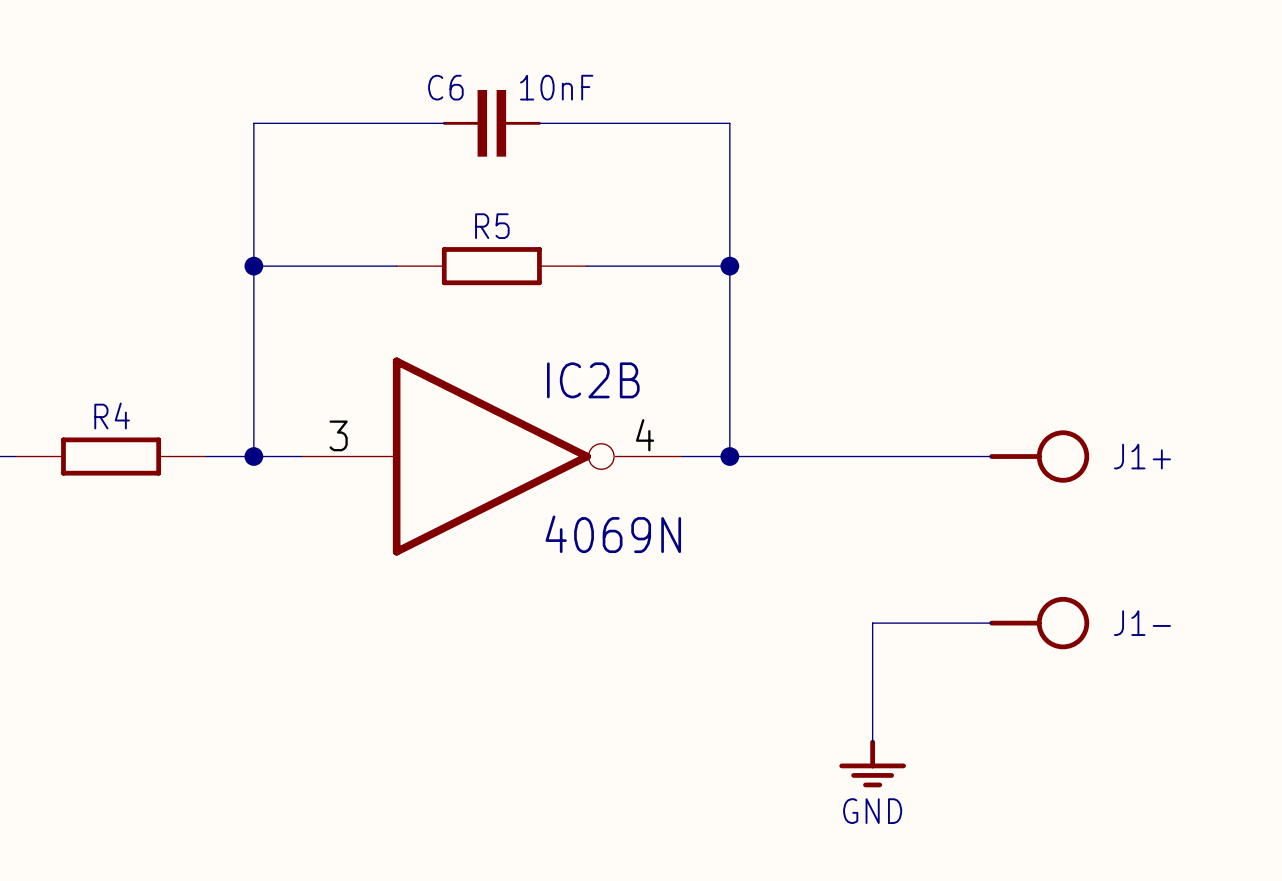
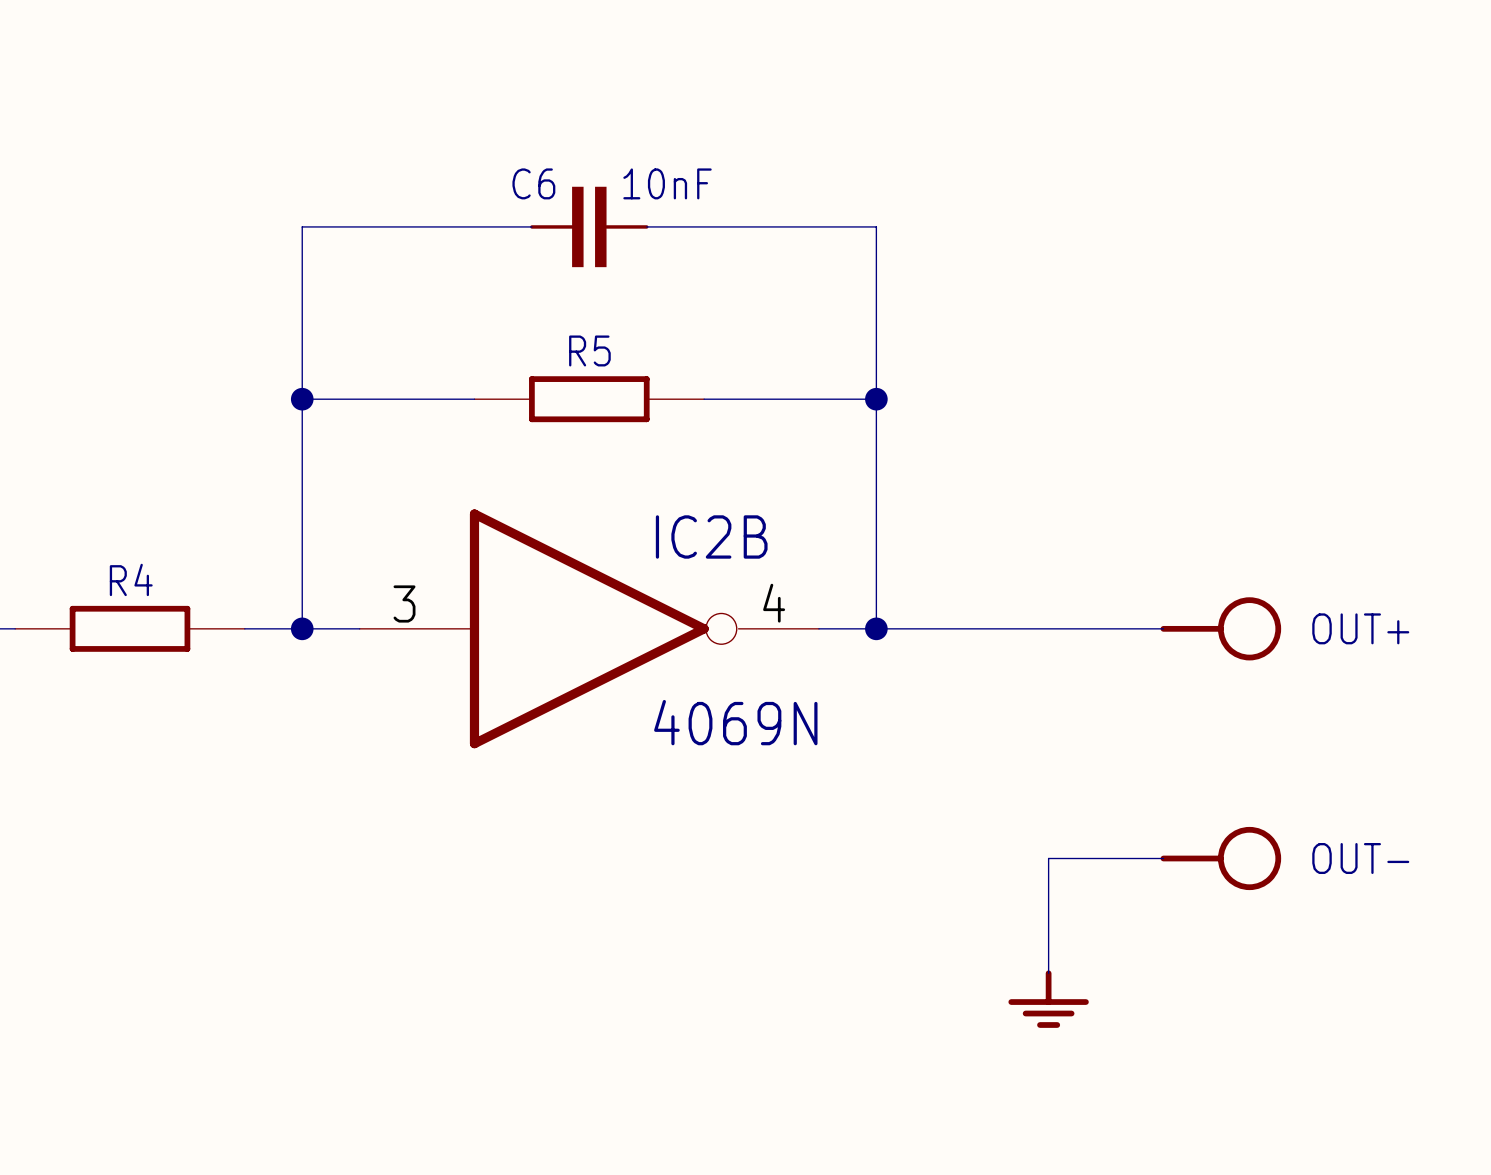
OUT+: none -> (1220, 628)
J1+: (1039, 456) -> none
wire: (991, 623) (872, 623) (872, 646) -> (1163, 858) (1048, 858)
J1-: (1039, 623) -> none
OUT-: none -> (1220, 858)
power symbol text: GND (872, 811) -> none

